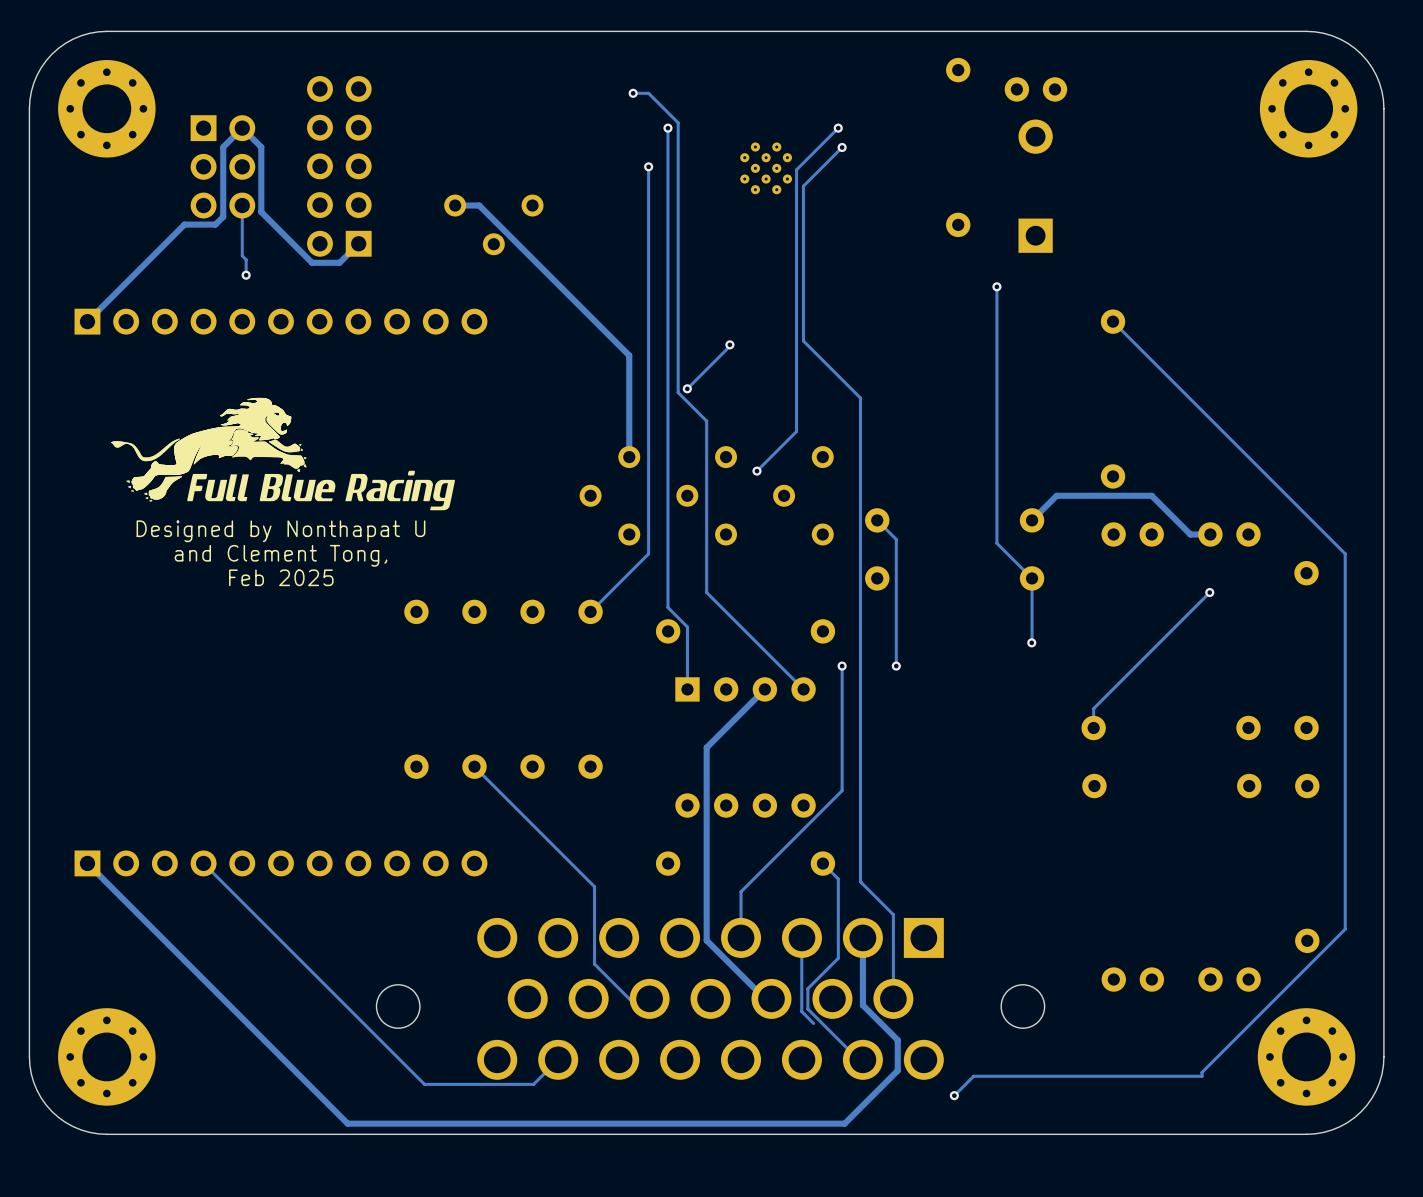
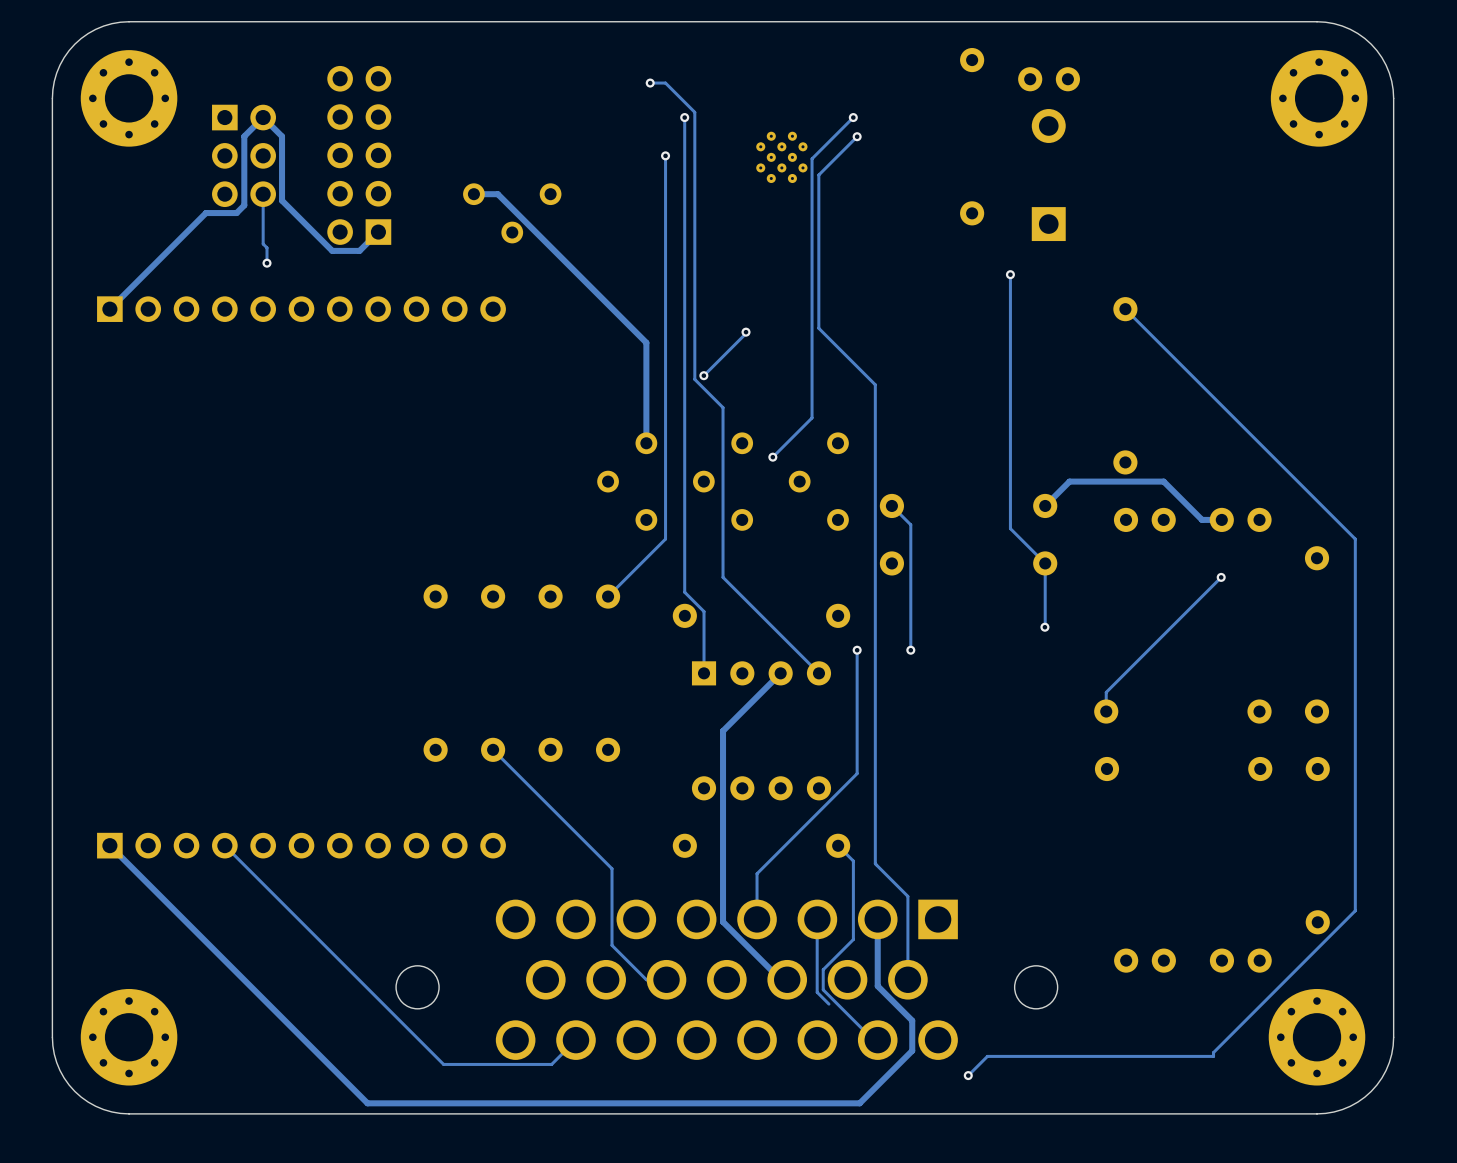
drawing: [110, 397, 455, 511] -> none
text: Designed by Nonthapat U (280, 531) -> none
text: and Clement Tong, (280, 555) -> none
text: Feb 2025 (281, 577) -> none

